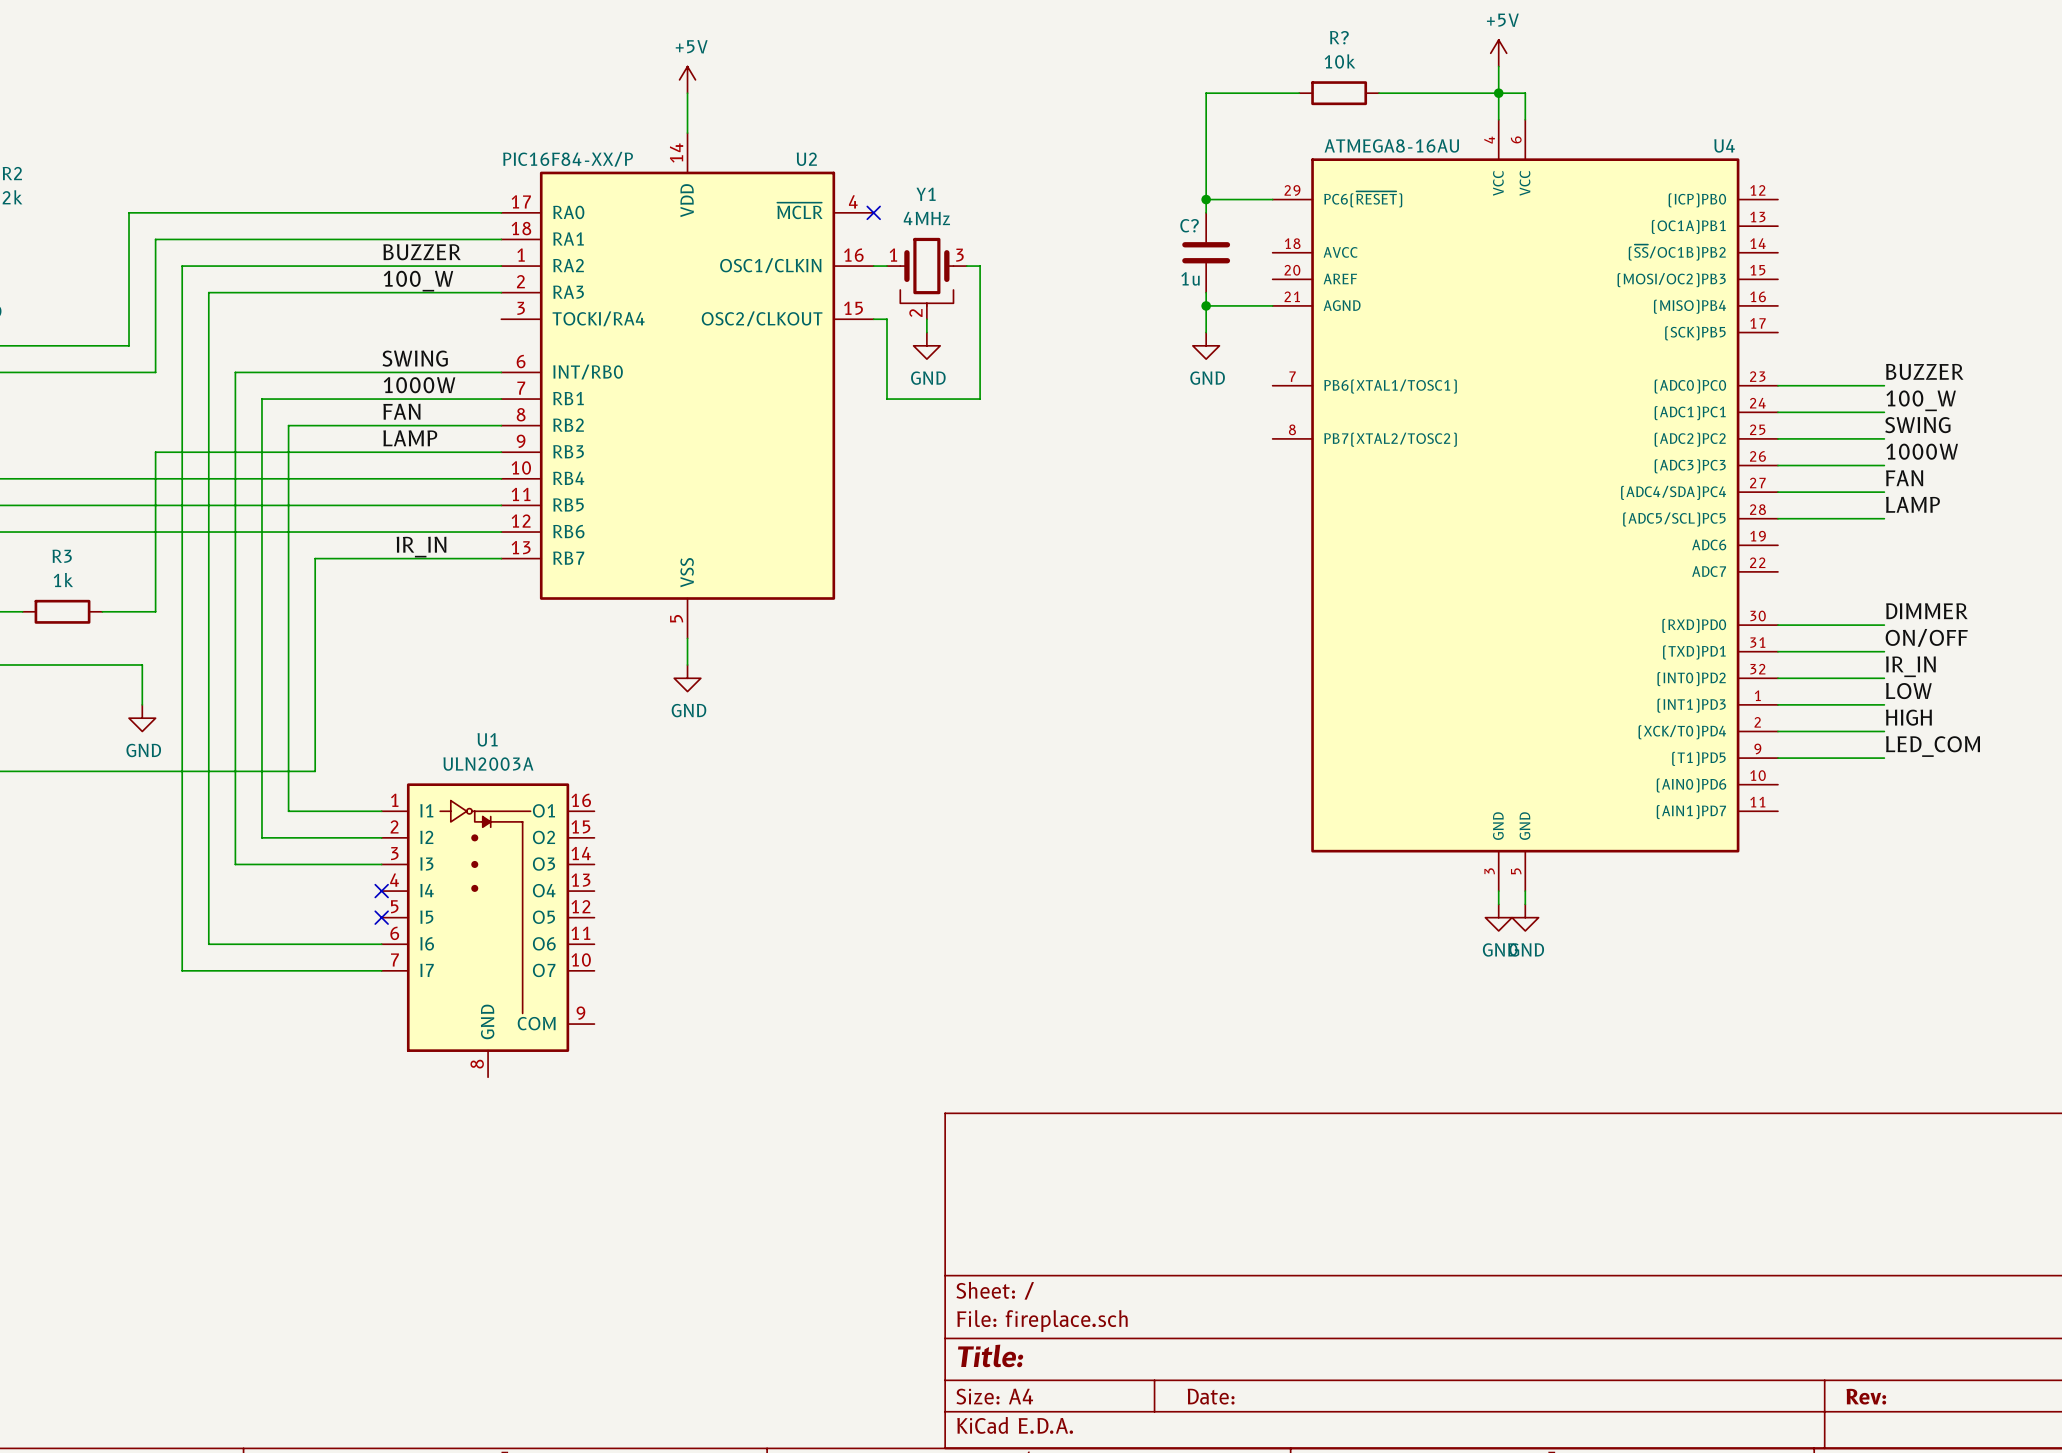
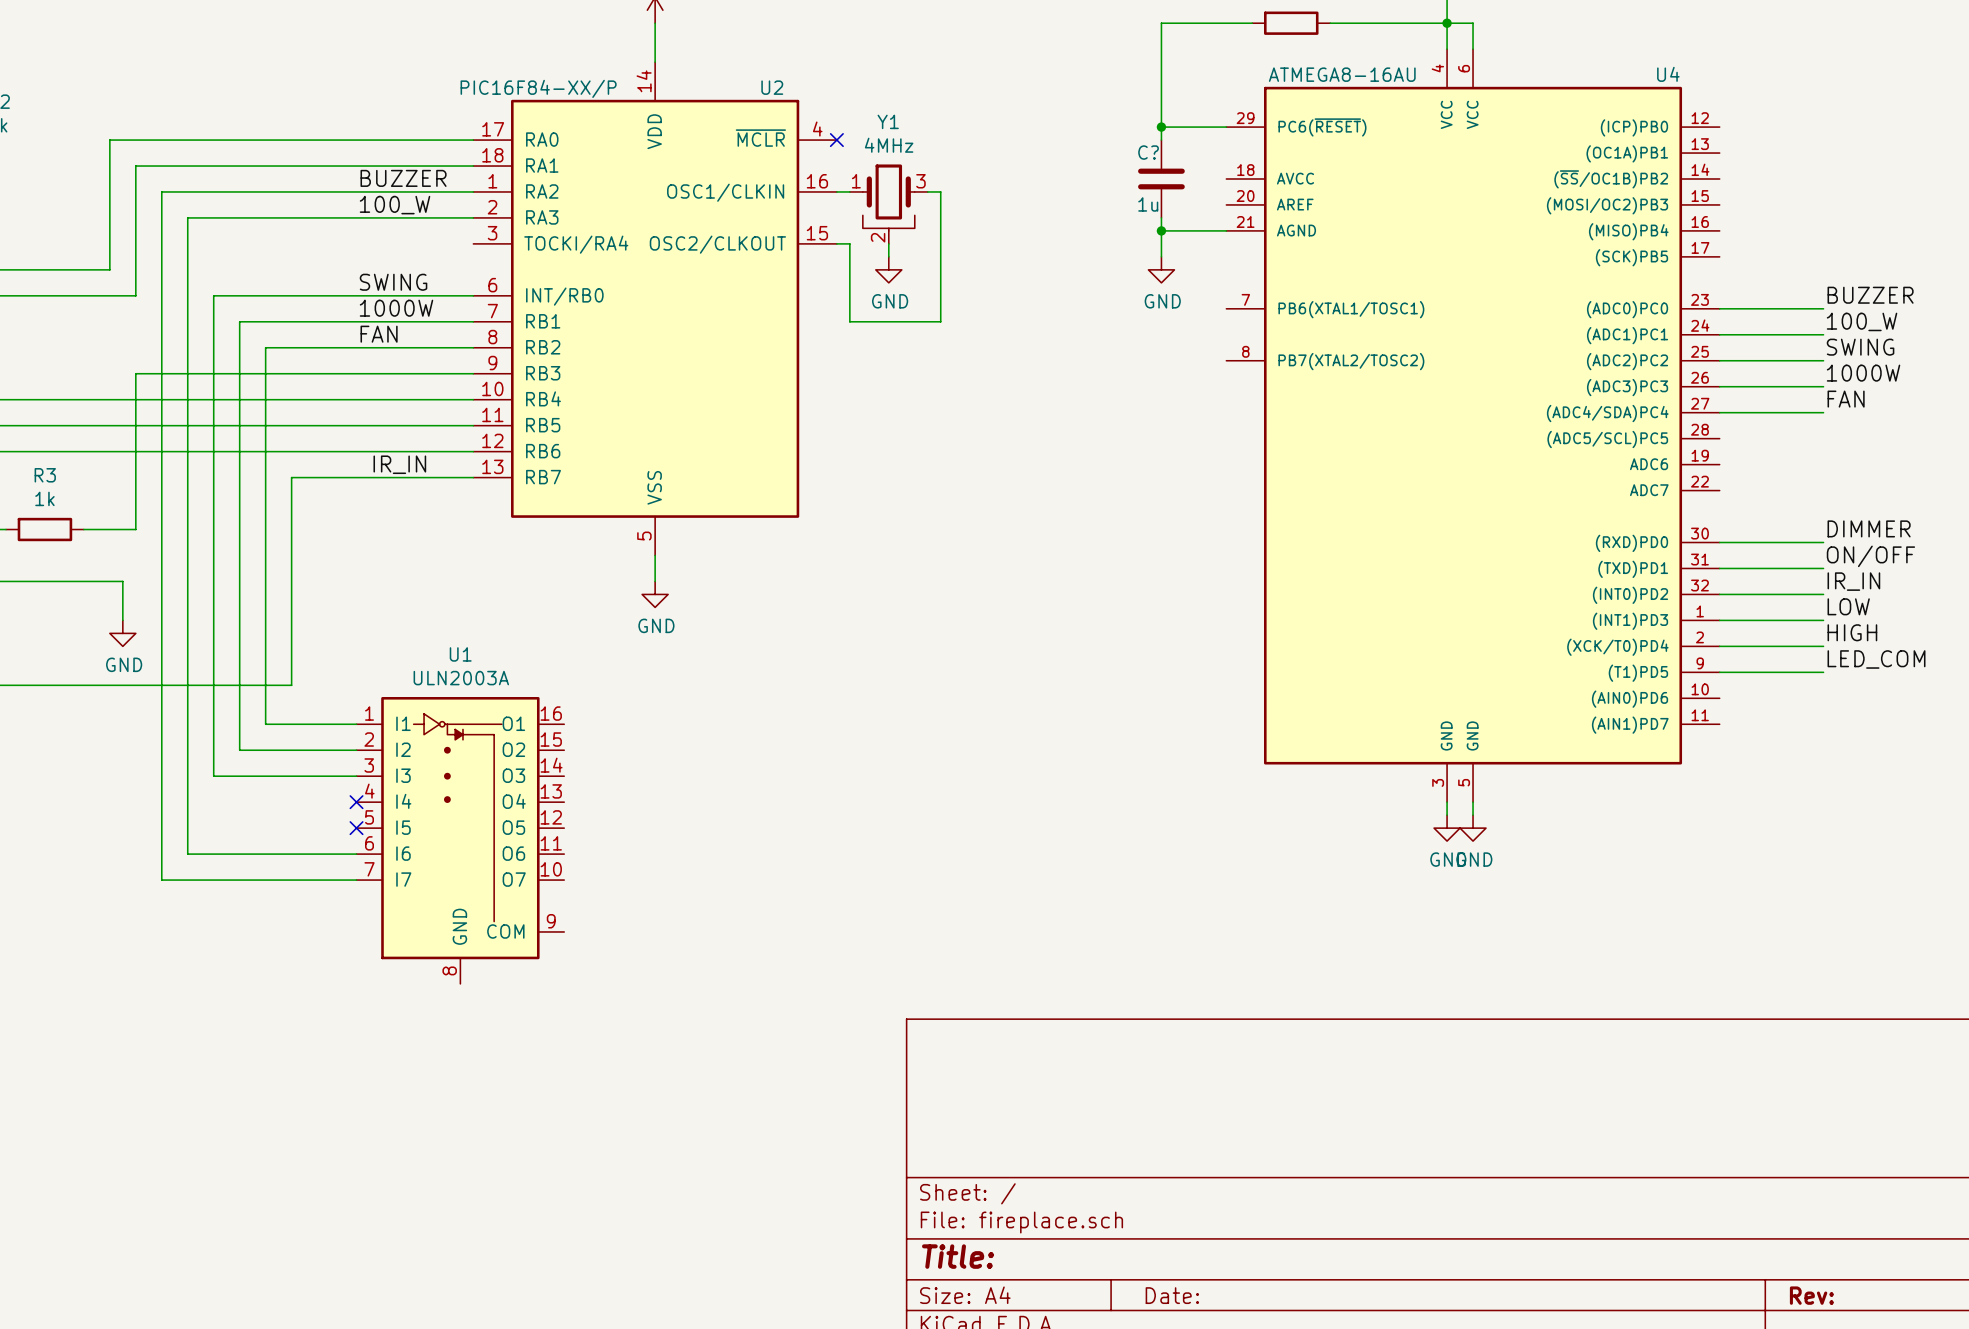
label: LAMP (410, 438) -> none
label: LAMP (1912, 504) -> none
wire: (1777, 518) (1884, 518) -> none

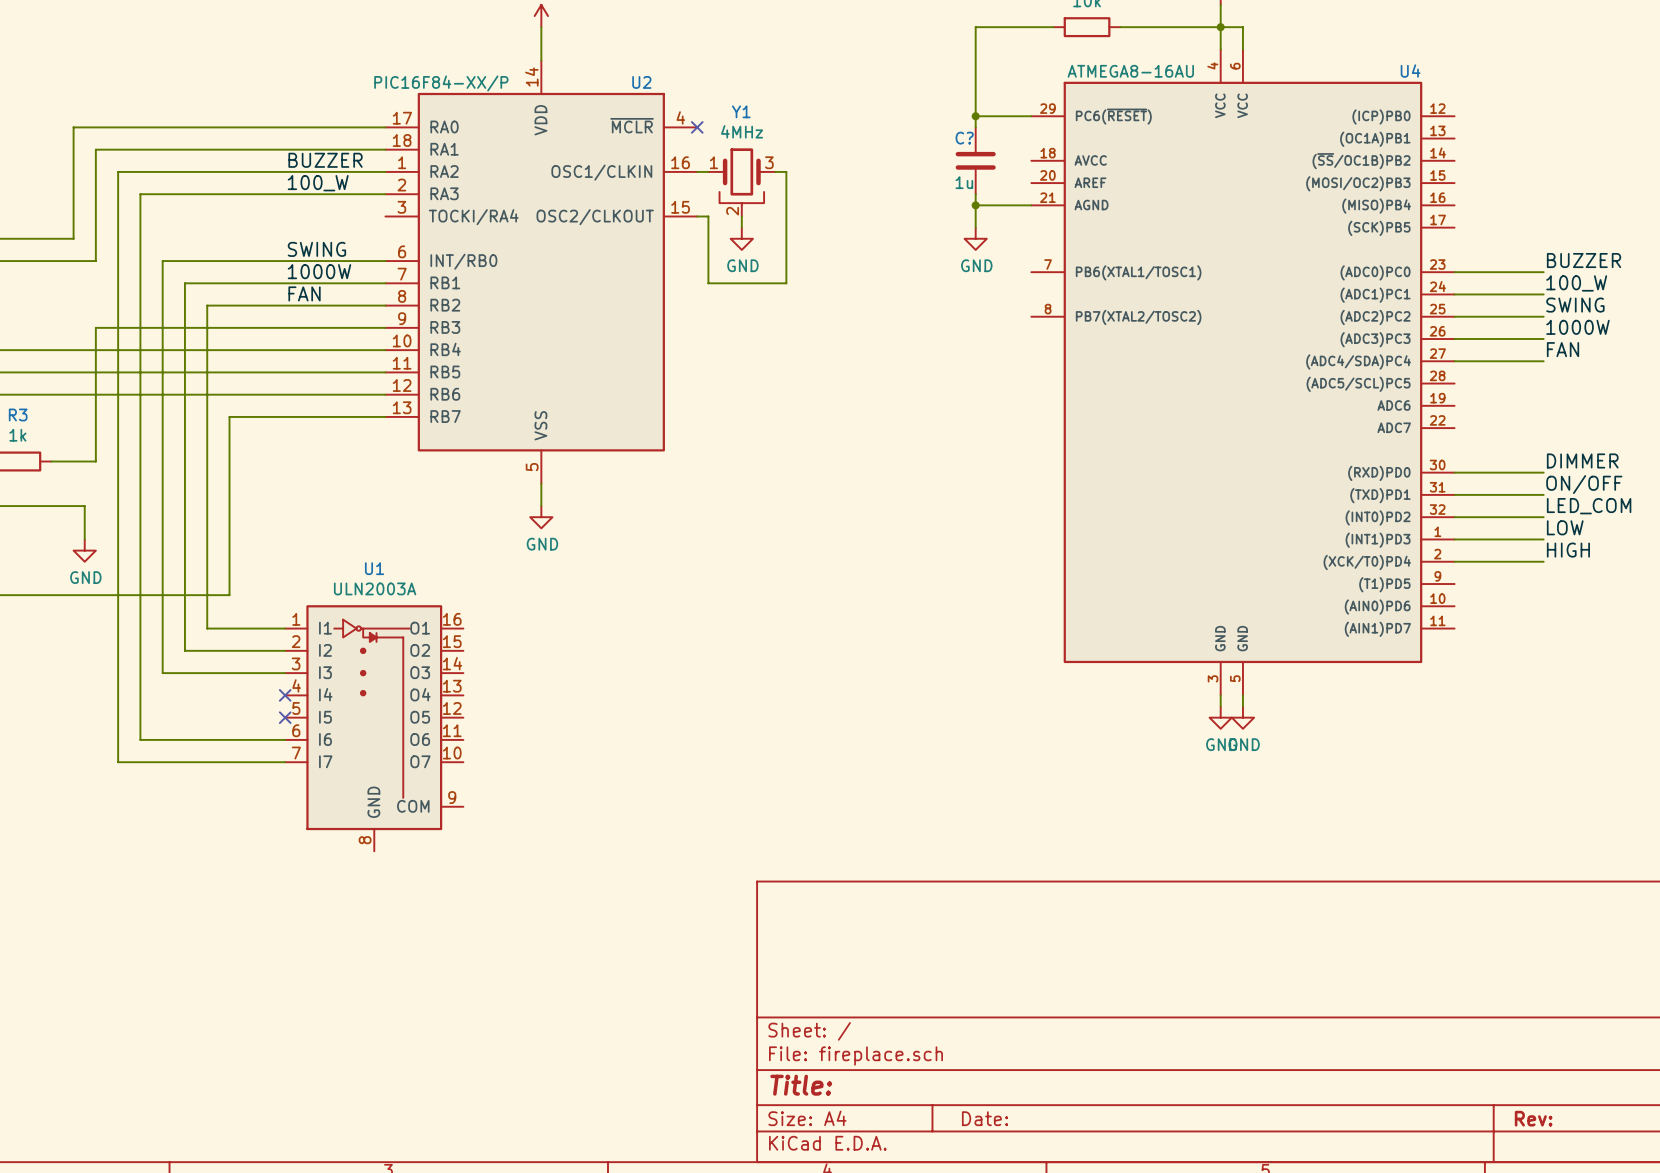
label: IR_IN (399, 464) -> none
label: IR_IN (1853, 581) -> LED_COM (1589, 506)
label: LED_COM (1876, 659) -> none
wire: (1719, 672) (1823, 672) -> none

